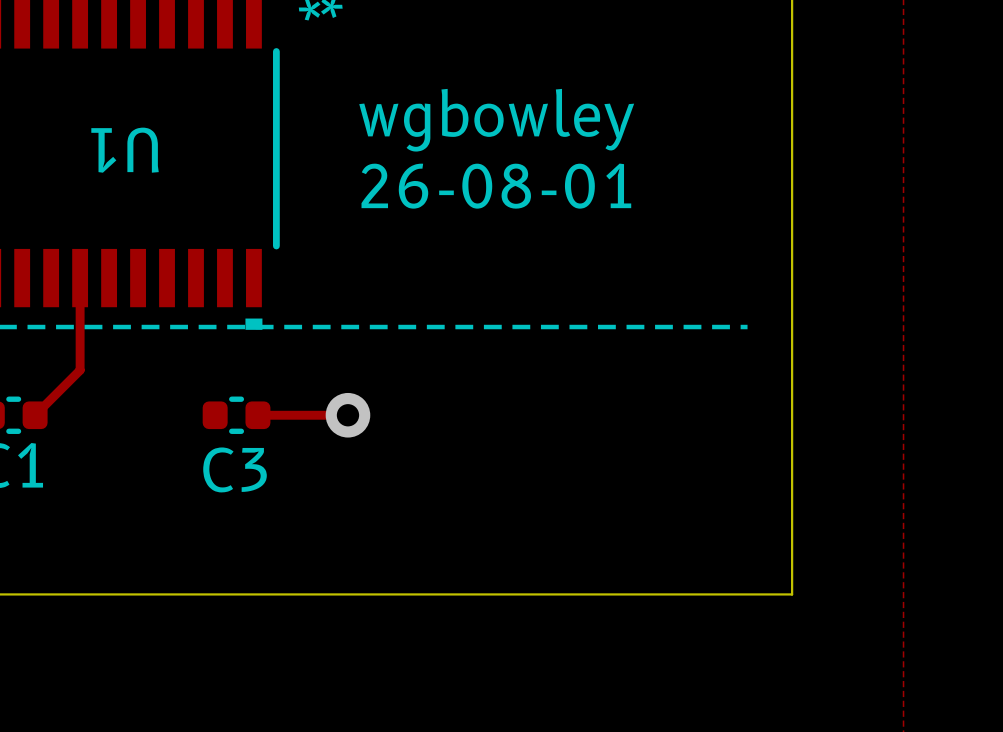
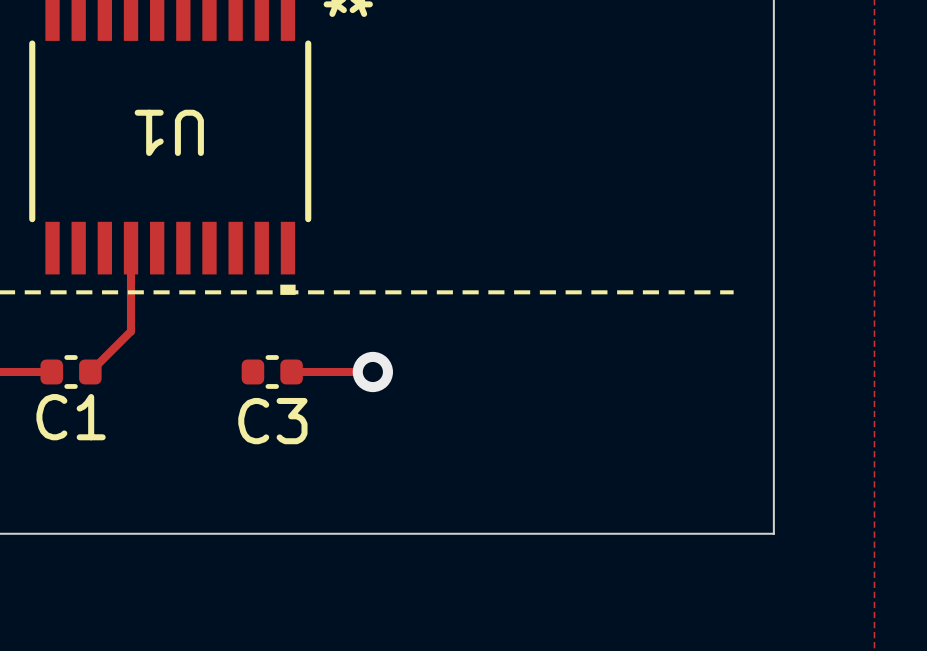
text: wgbowley (496, 120) -> none
text: 26-08-01 (496, 186) -> none

